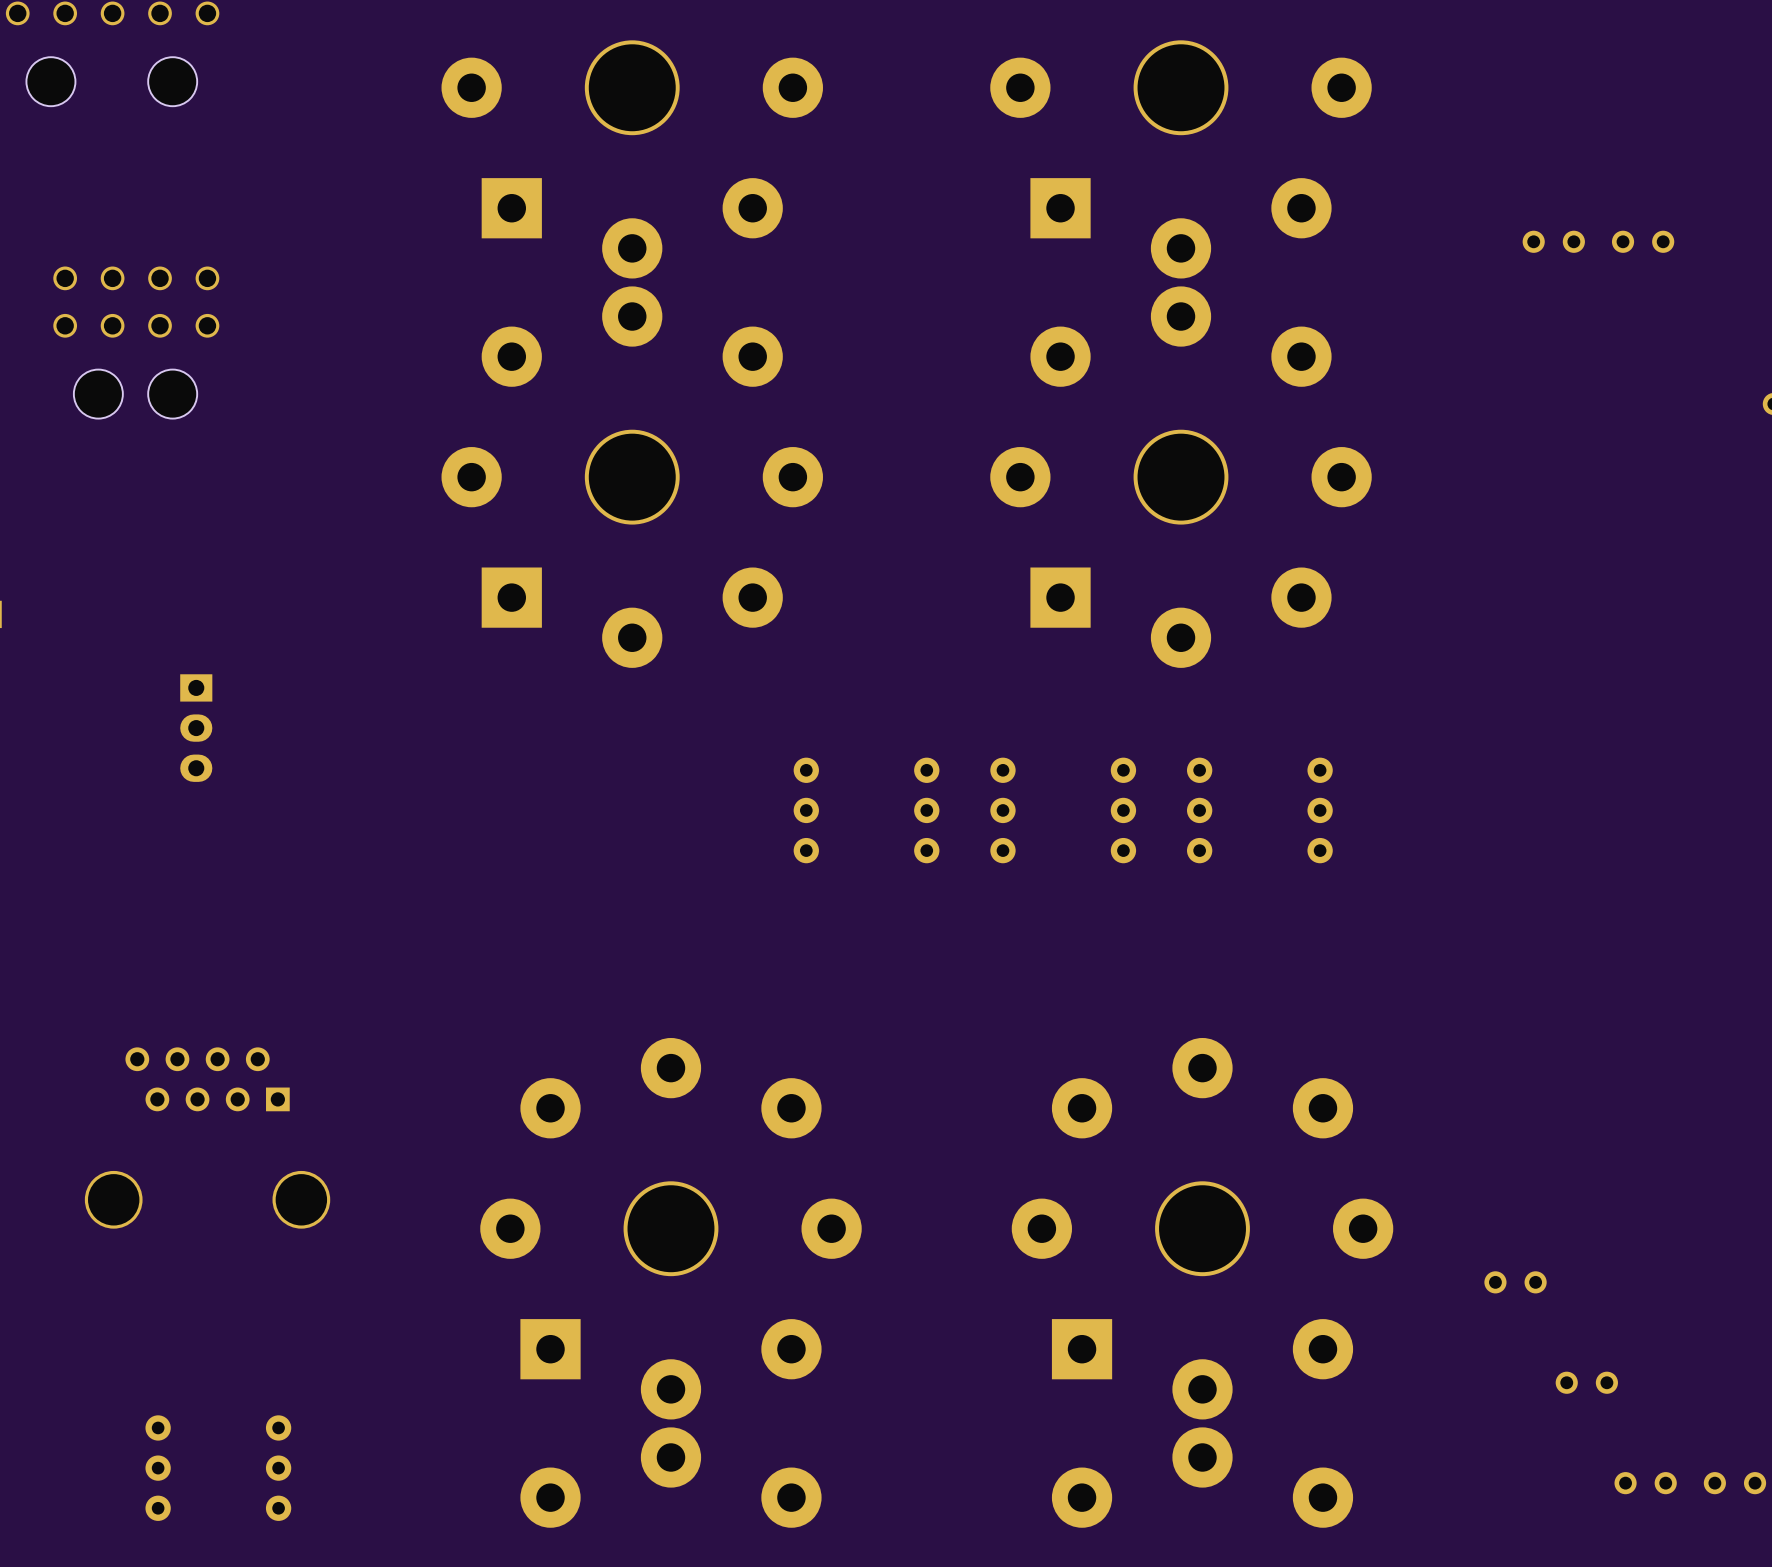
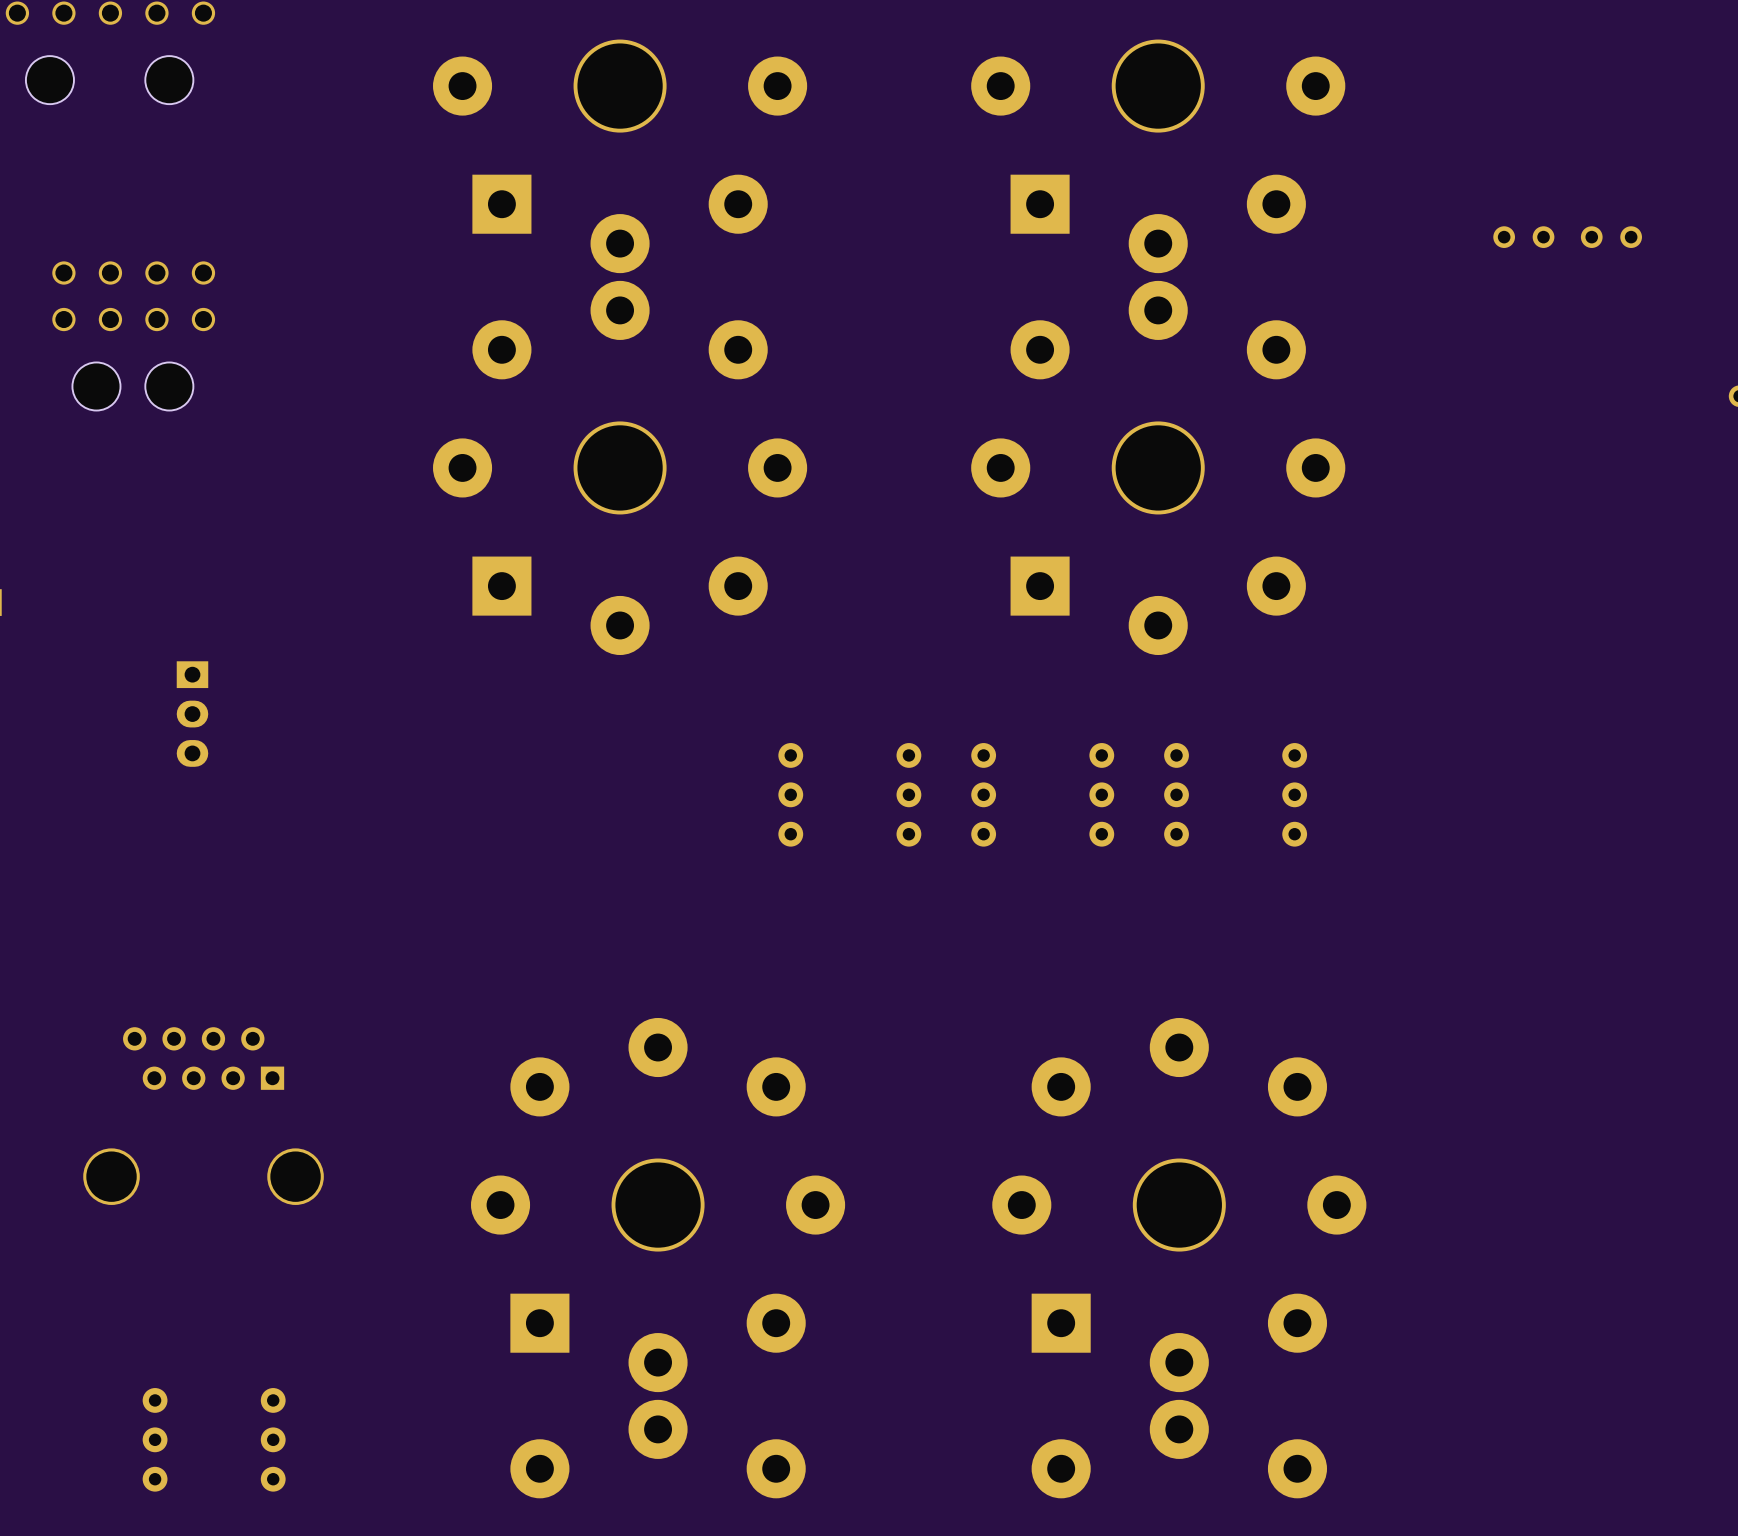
part: (1515, 1282) -> none
part: (1586, 1382) -> none
part: (1645, 1483) -> none
part: (1734, 1483) -> none

